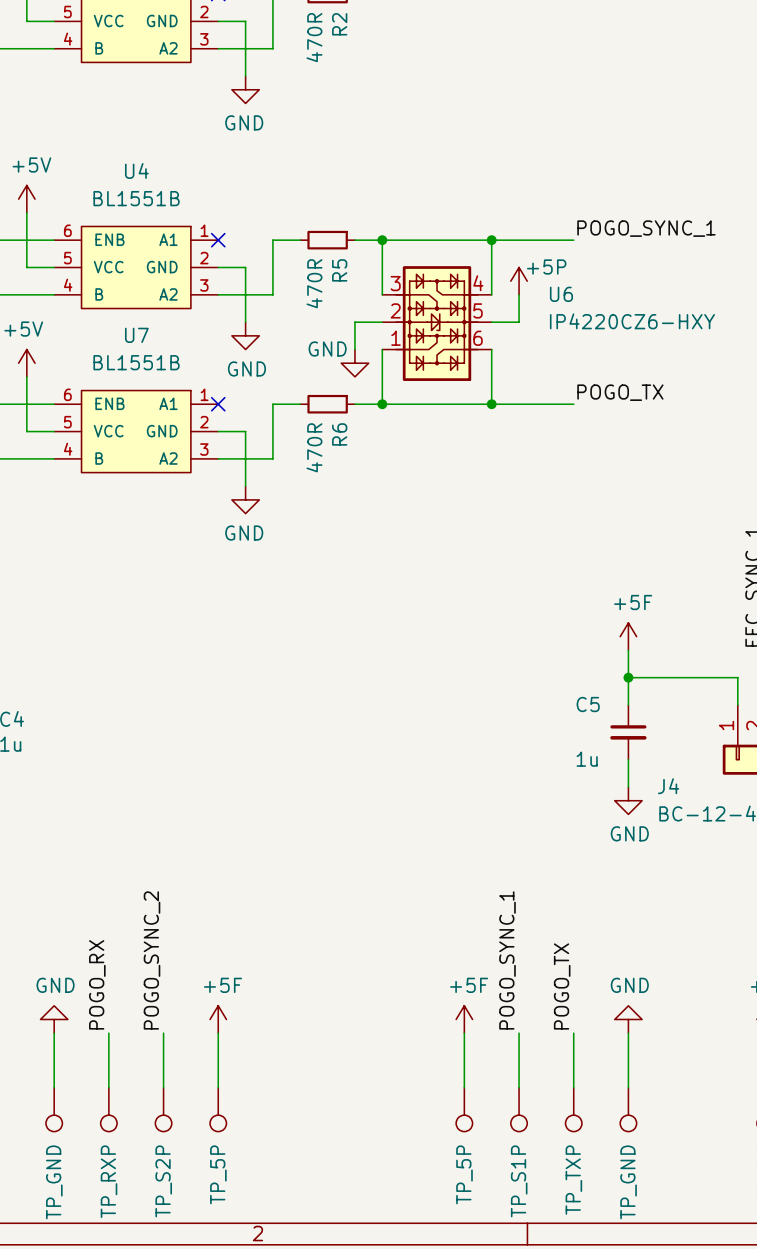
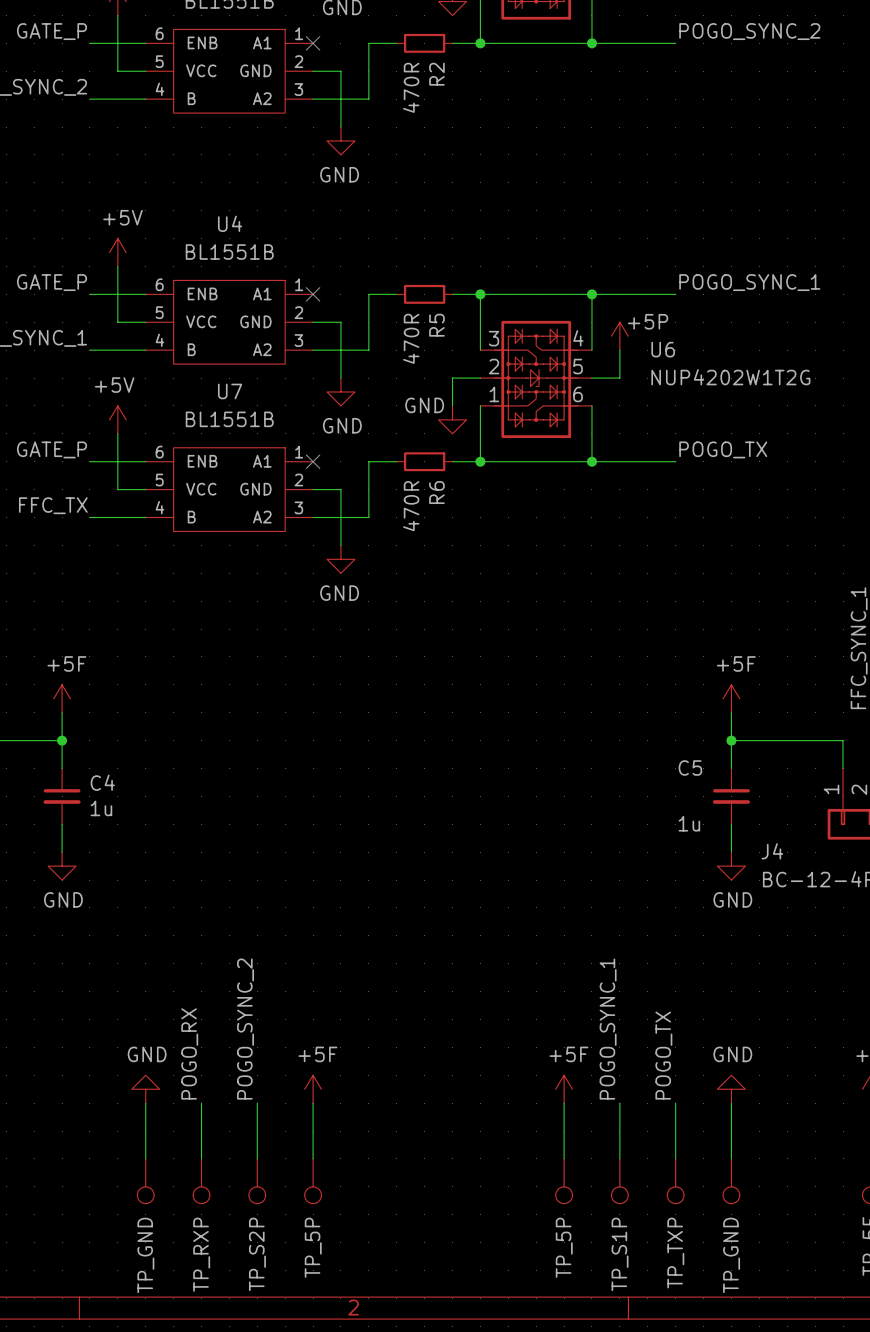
U6 value: IP4220CZ6-HXY (632, 321) -> NUP4202W1T2G (730, 377)

